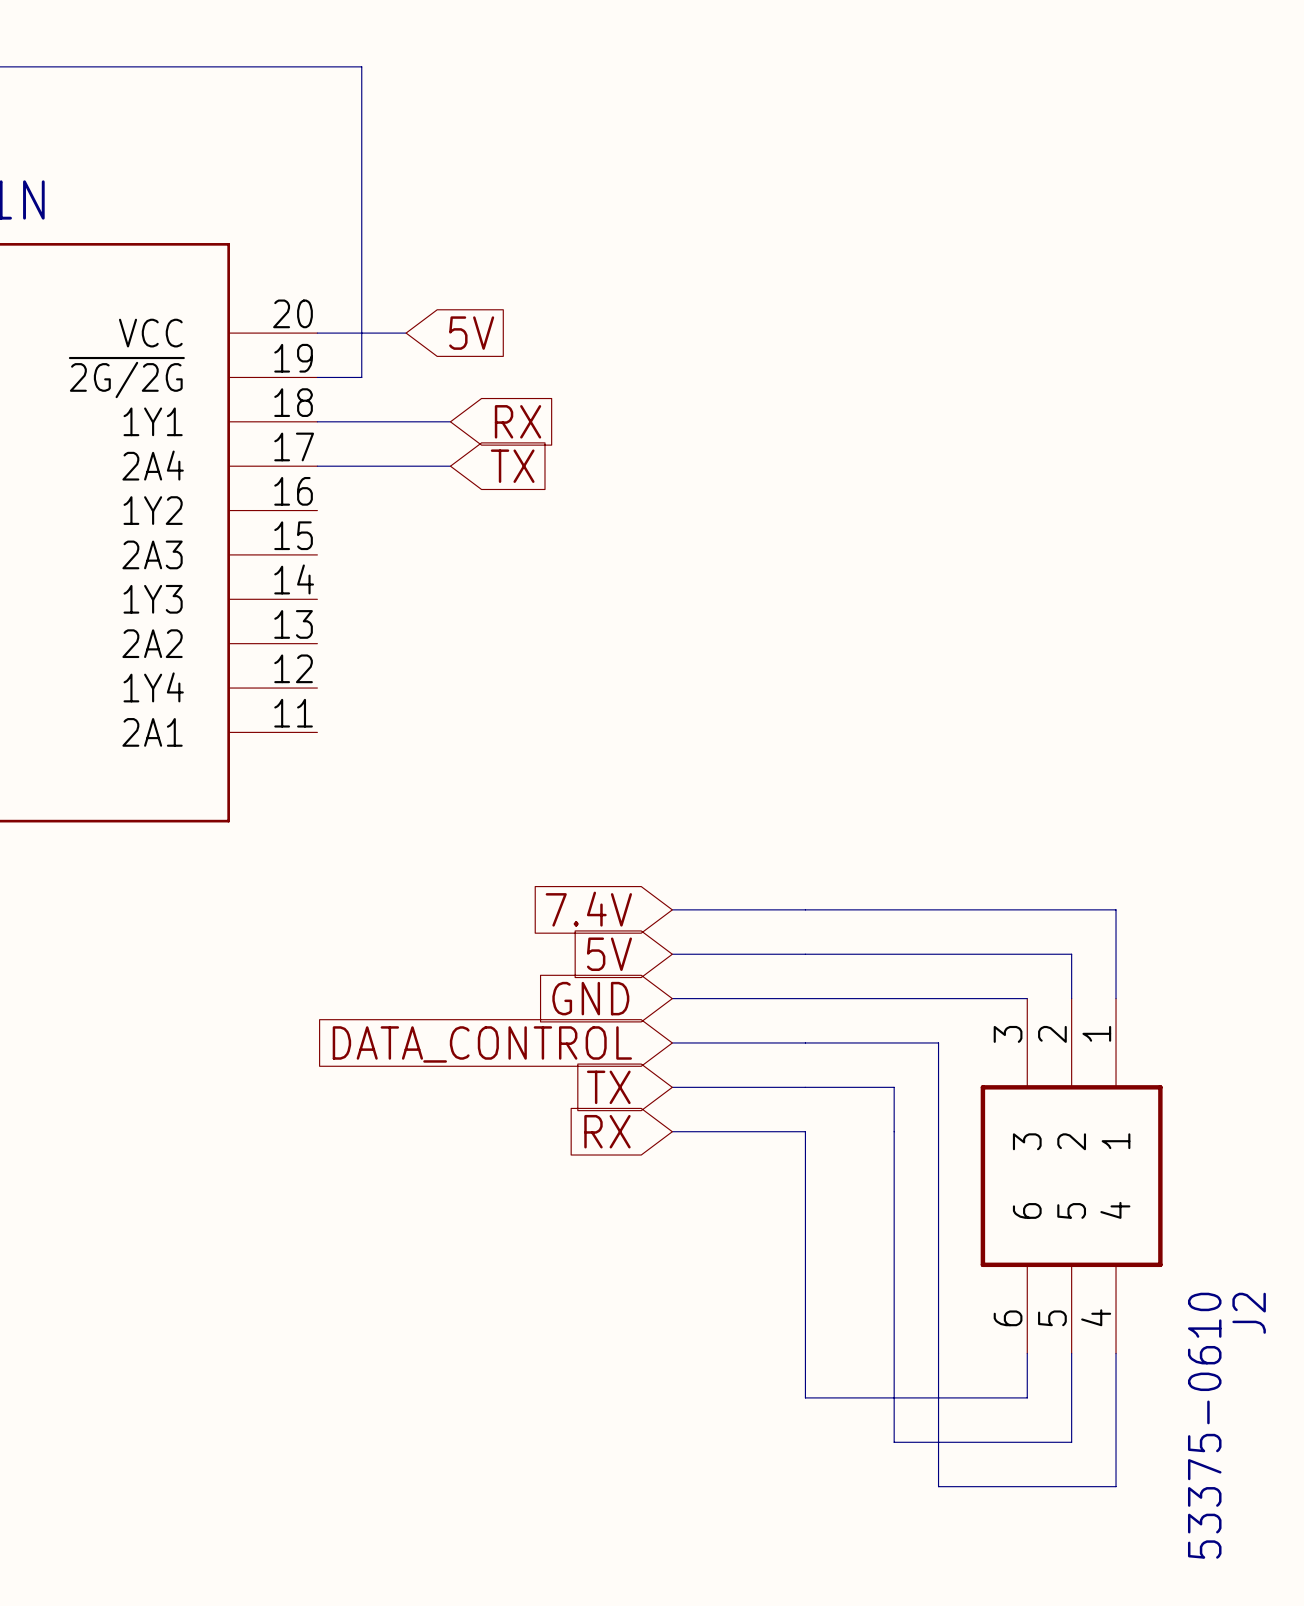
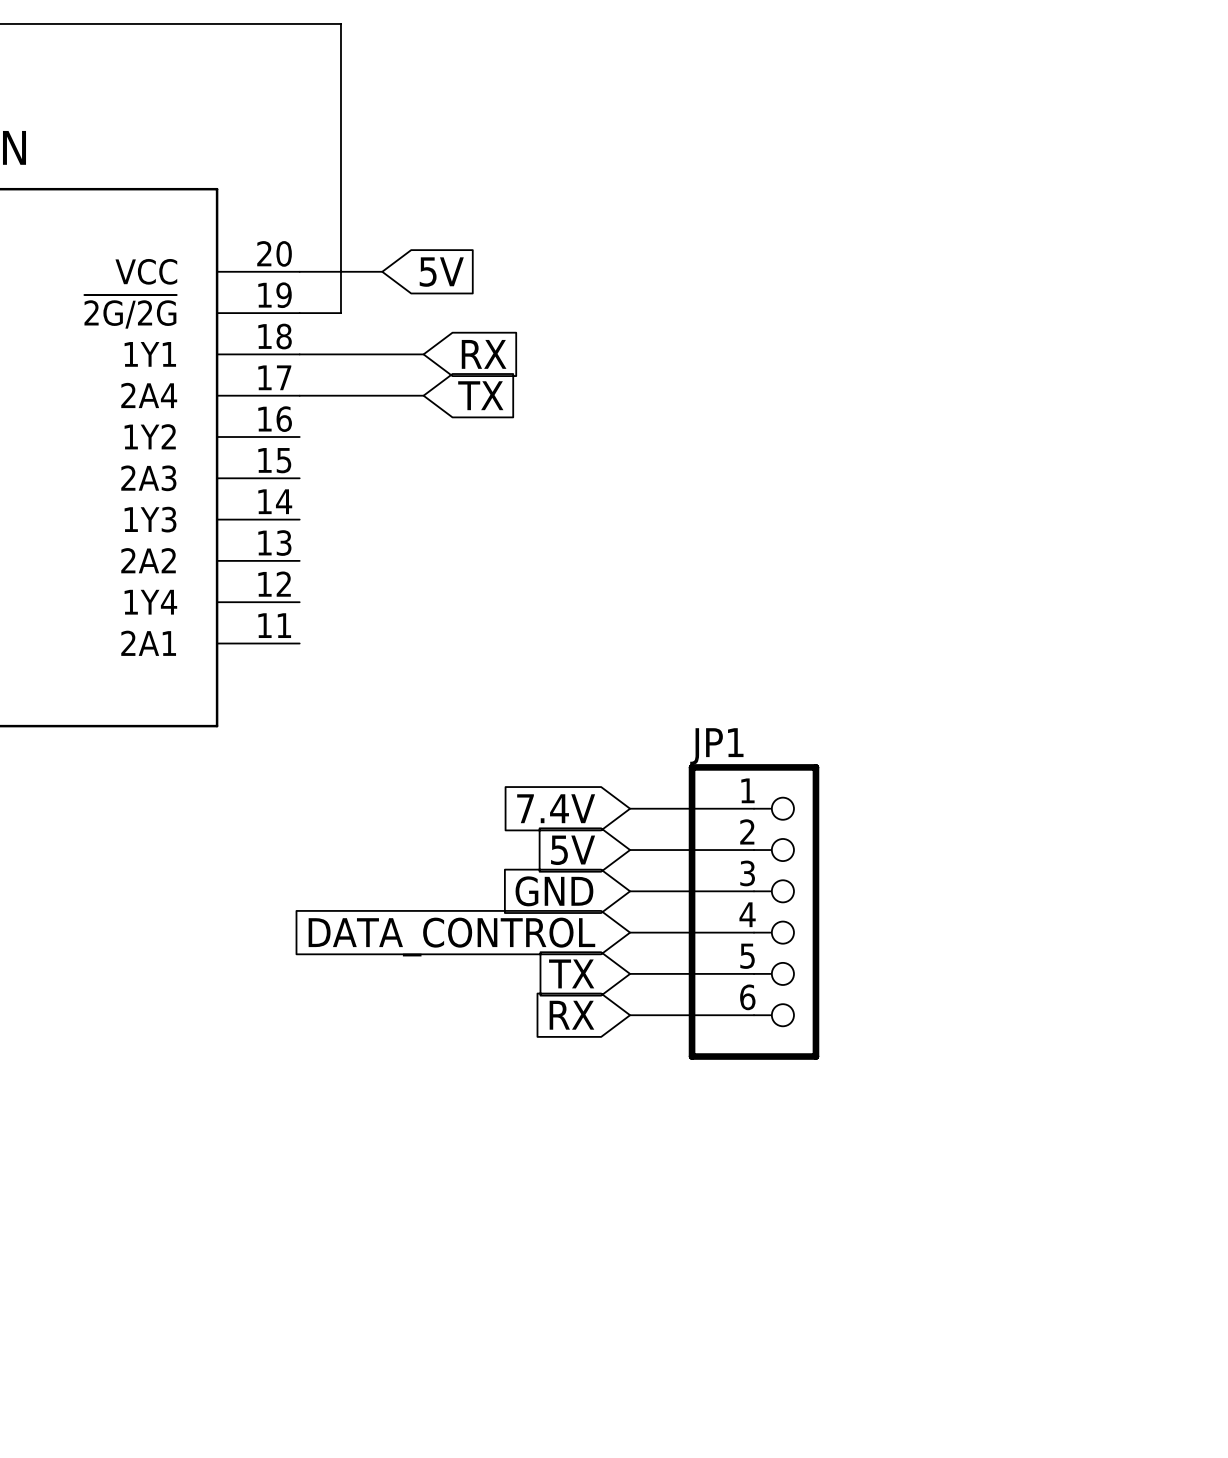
wire: (805, 909) (1116, 909) (1116, 998) -> none
wire: (805, 954) (1071, 954) (1071, 998) -> none
wire: (805, 998) (1027, 998) -> none
JP1: none -> (754, 911)
wire: (805, 1042) (938, 1042) (938, 1486) (1116, 1486) (1116, 1353) -> none
wire: (805, 1087) (894, 1087) (894, 1442) (1071, 1442) (1071, 1353) -> none
wire: (805, 1131) (805, 1397) (1027, 1397) (1027, 1353) -> none
J2: 53375-0610 (1071, 1176) -> none

